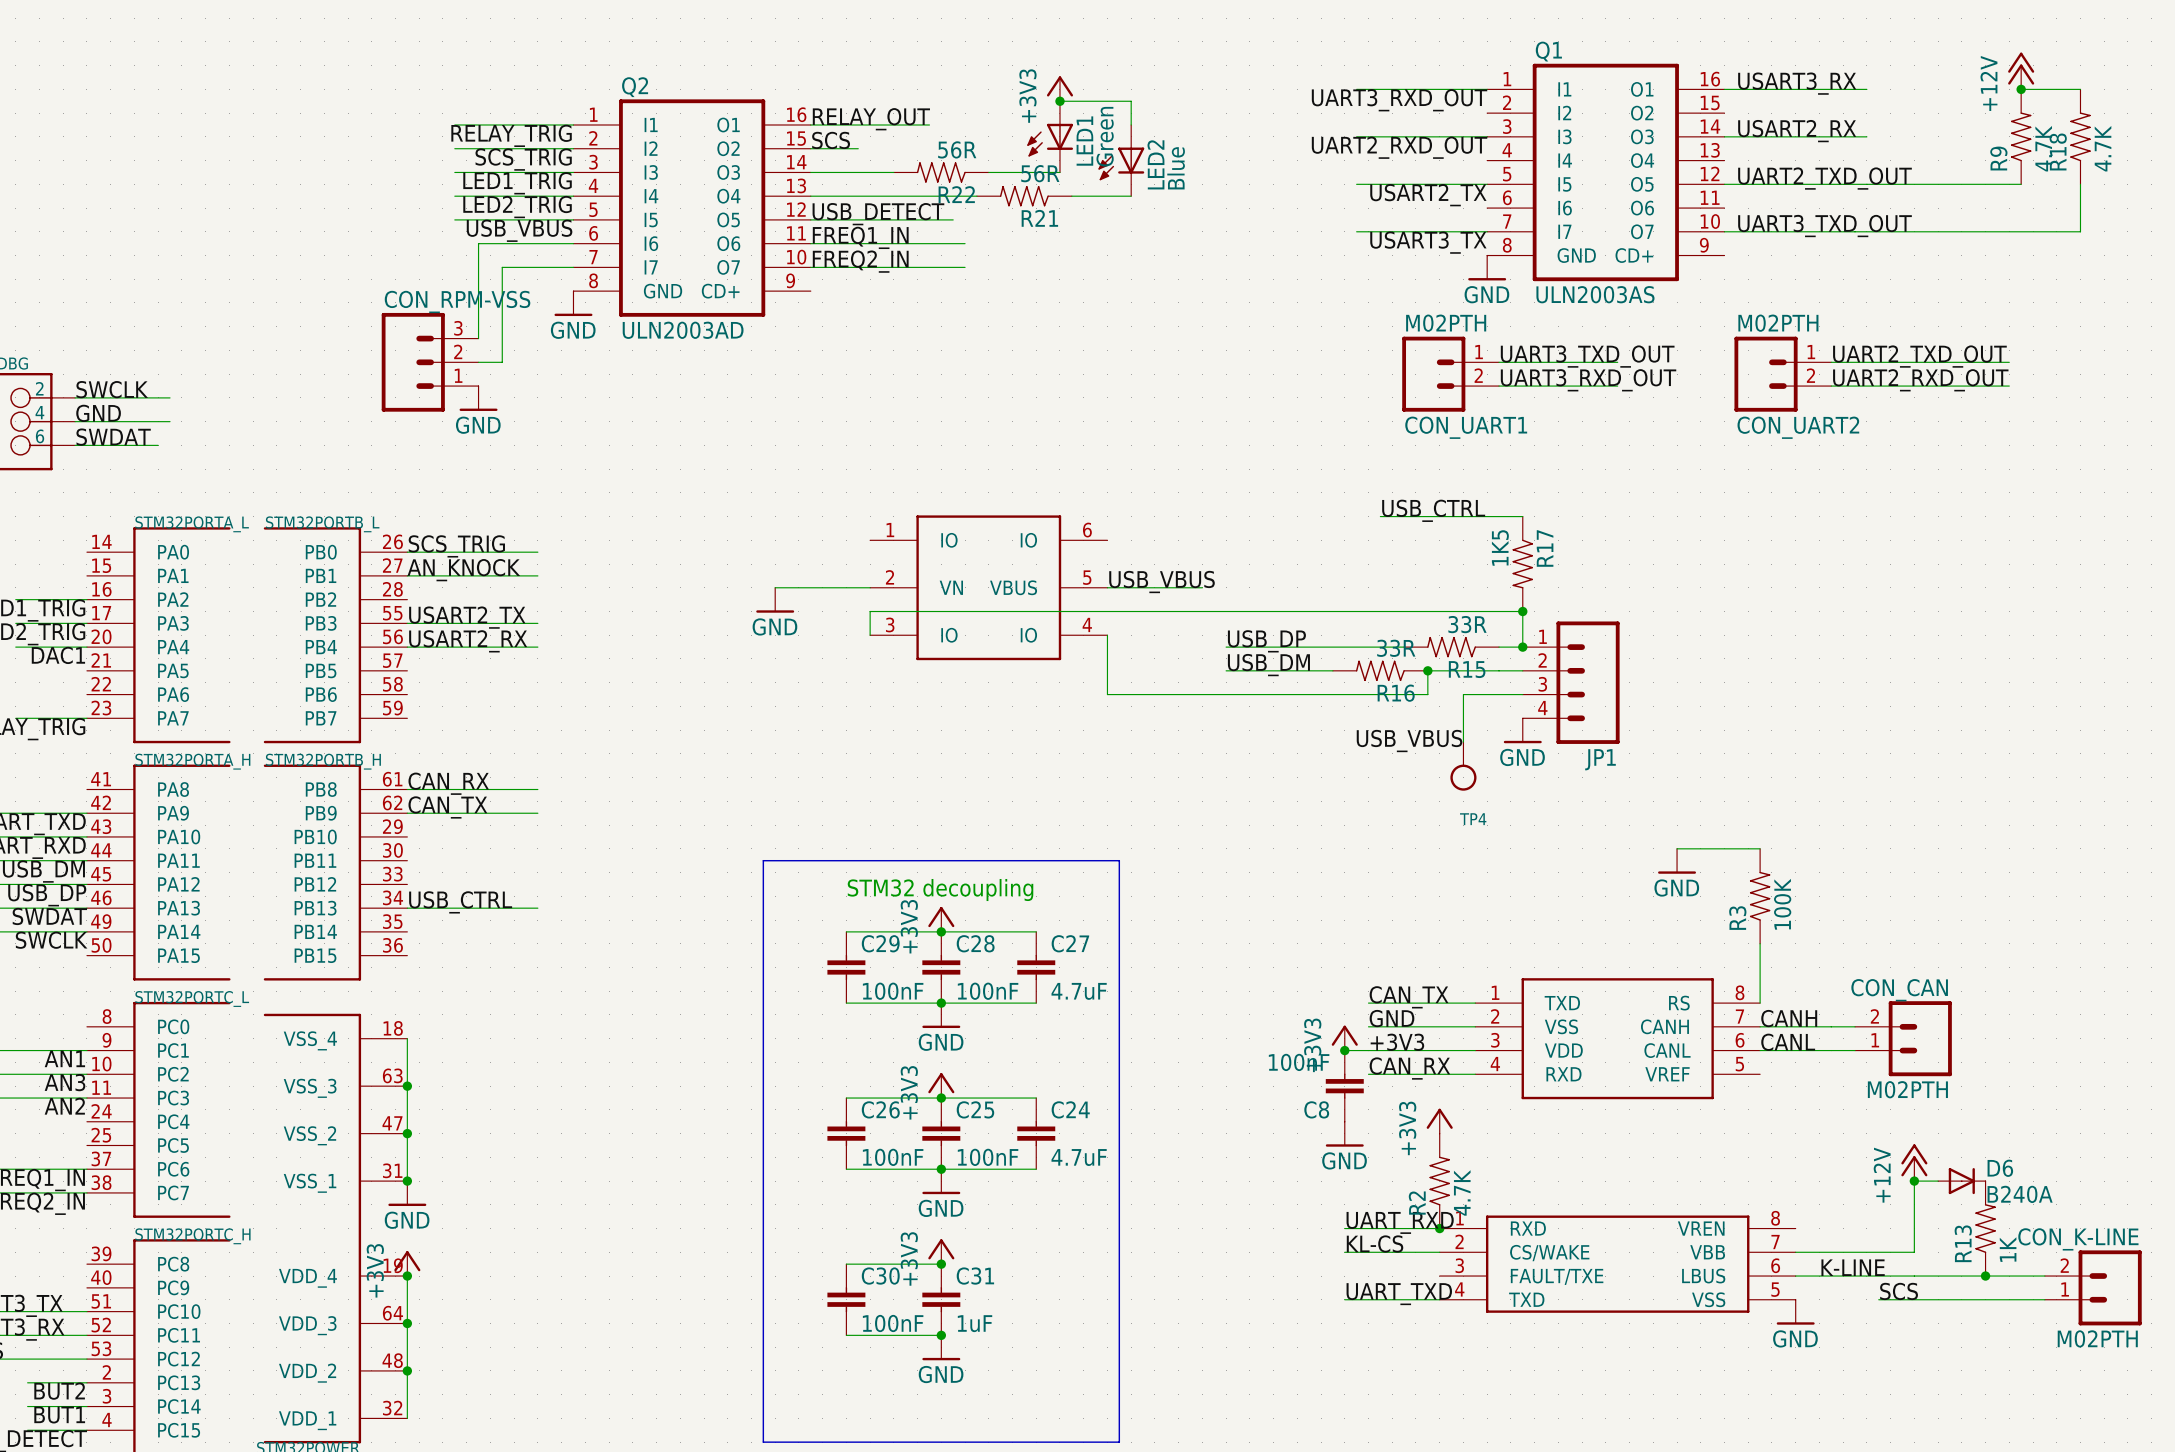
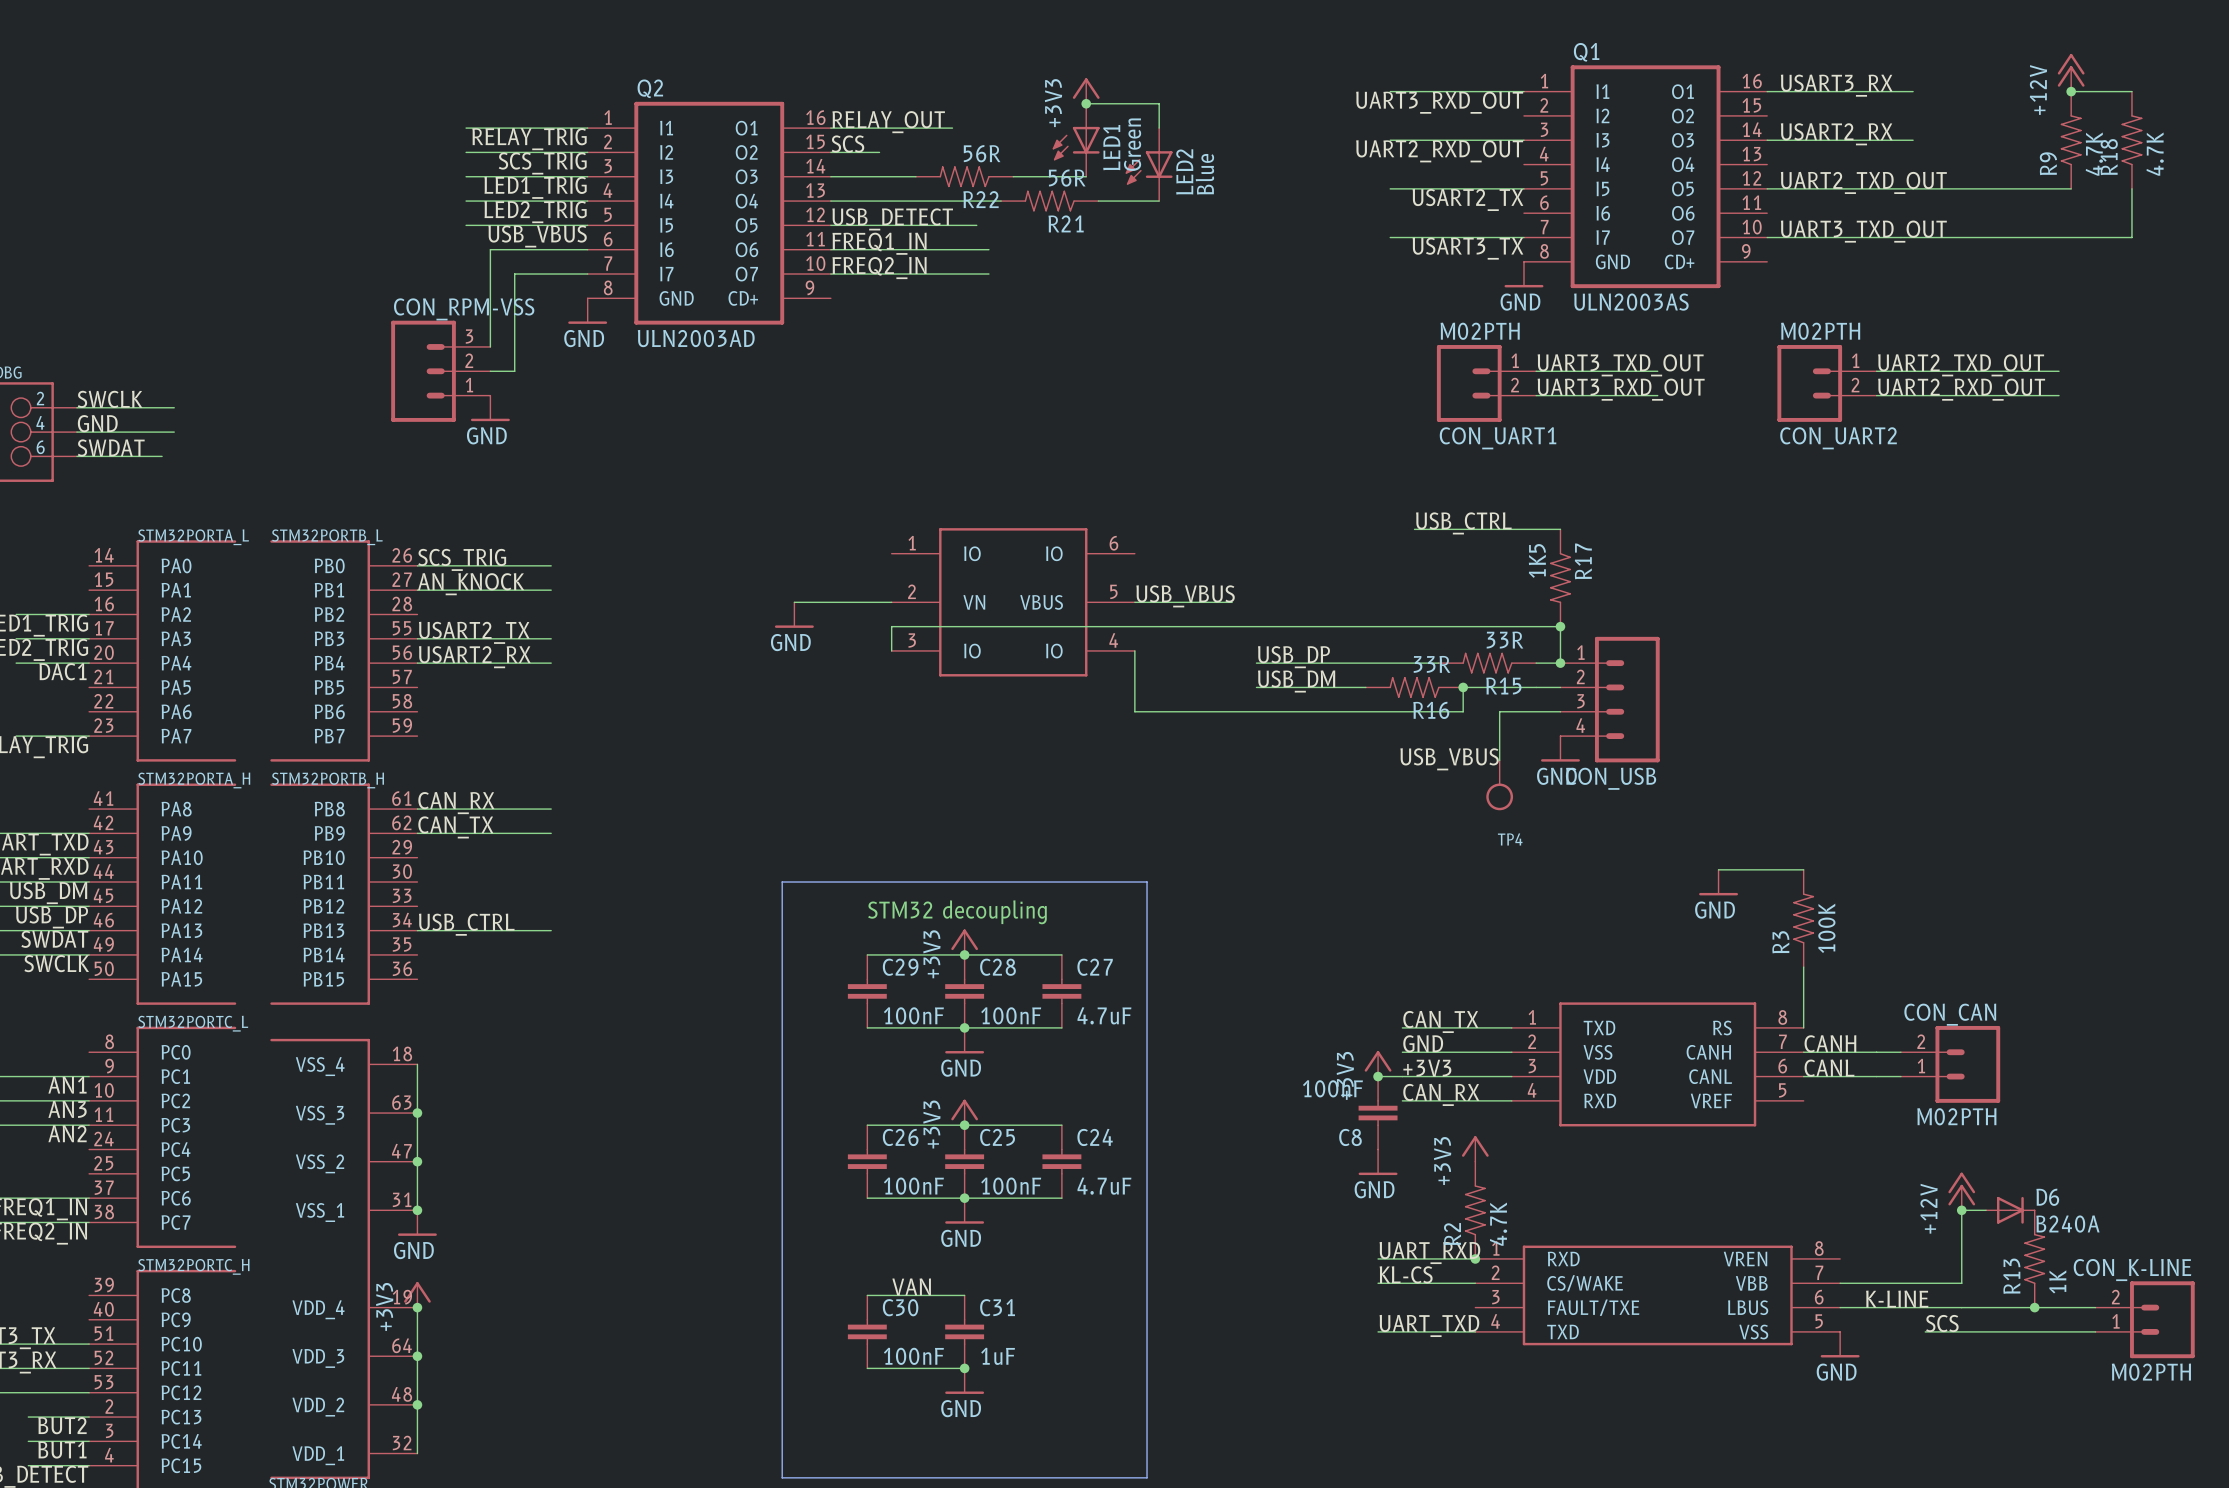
JP1 name: JP1 (1600, 759) -> CON_USB (1611, 778)
power symbol: +3V3 (941, 1251) -> none
label: none -> VAN (911, 1287)
junction: (941, 1264) -> none

